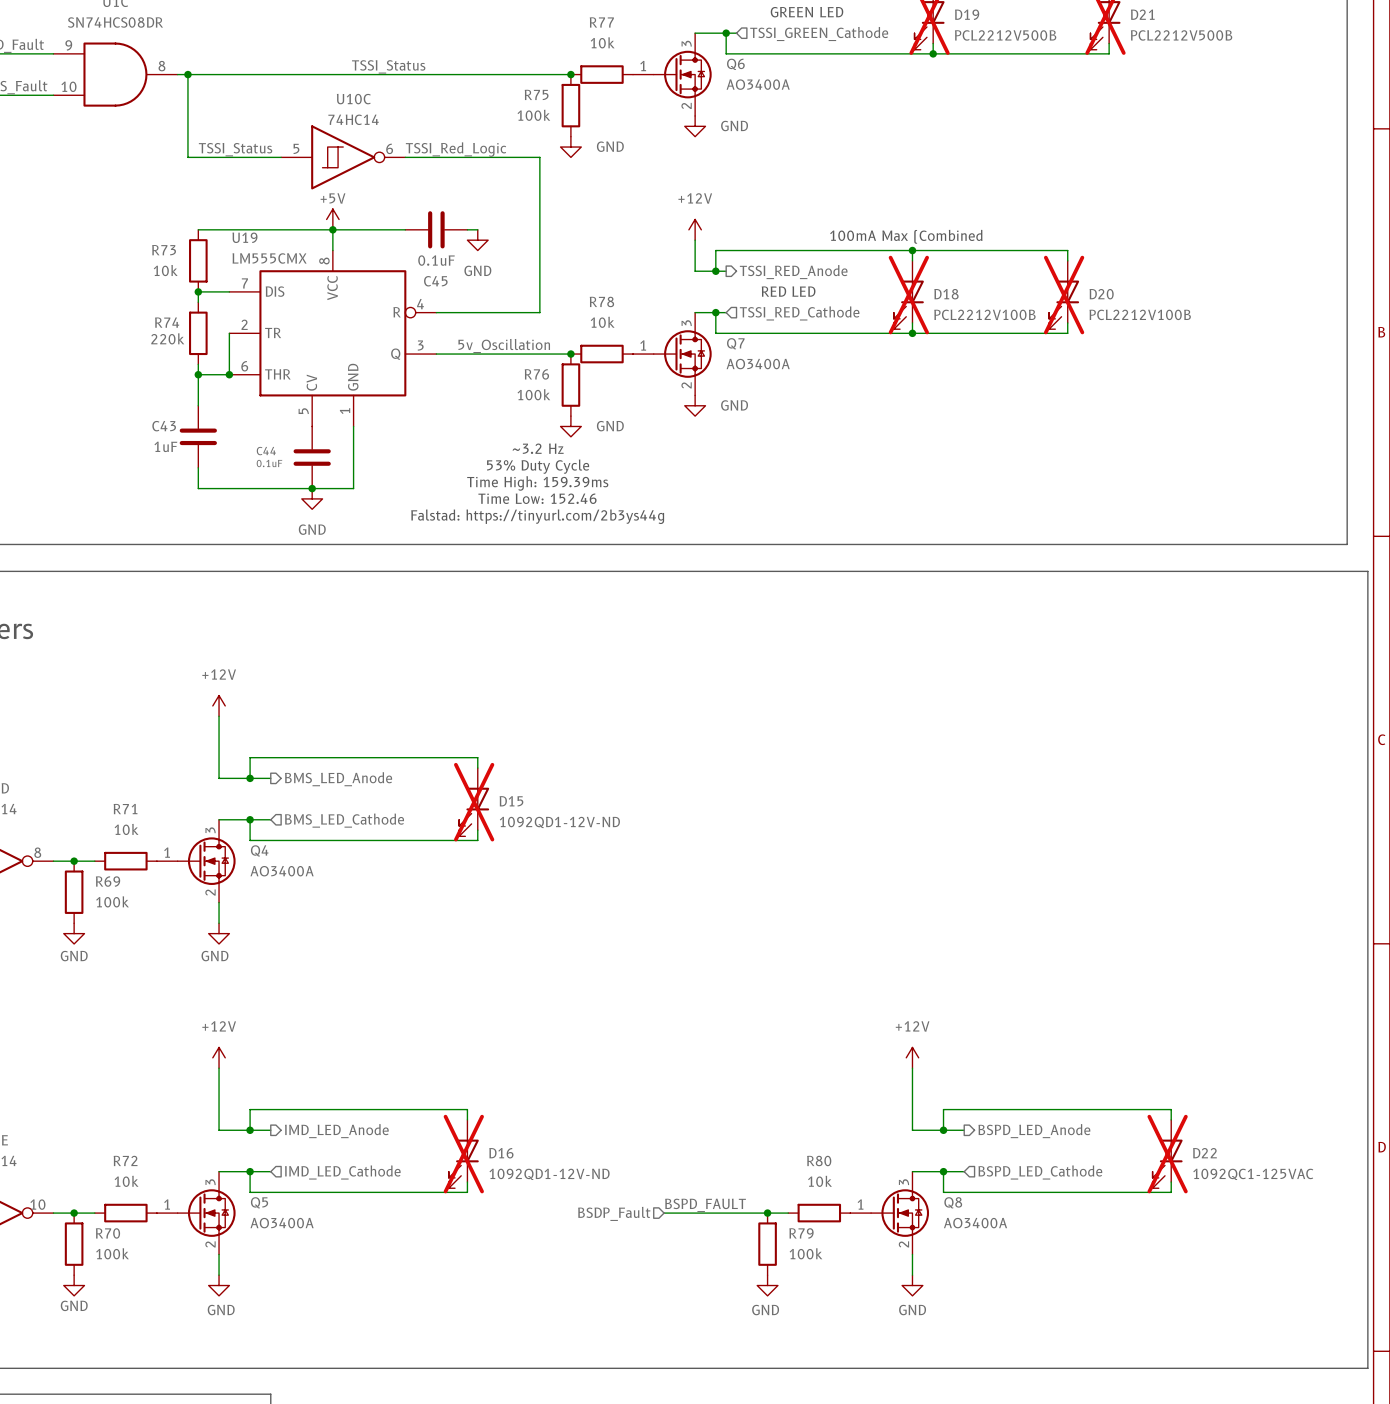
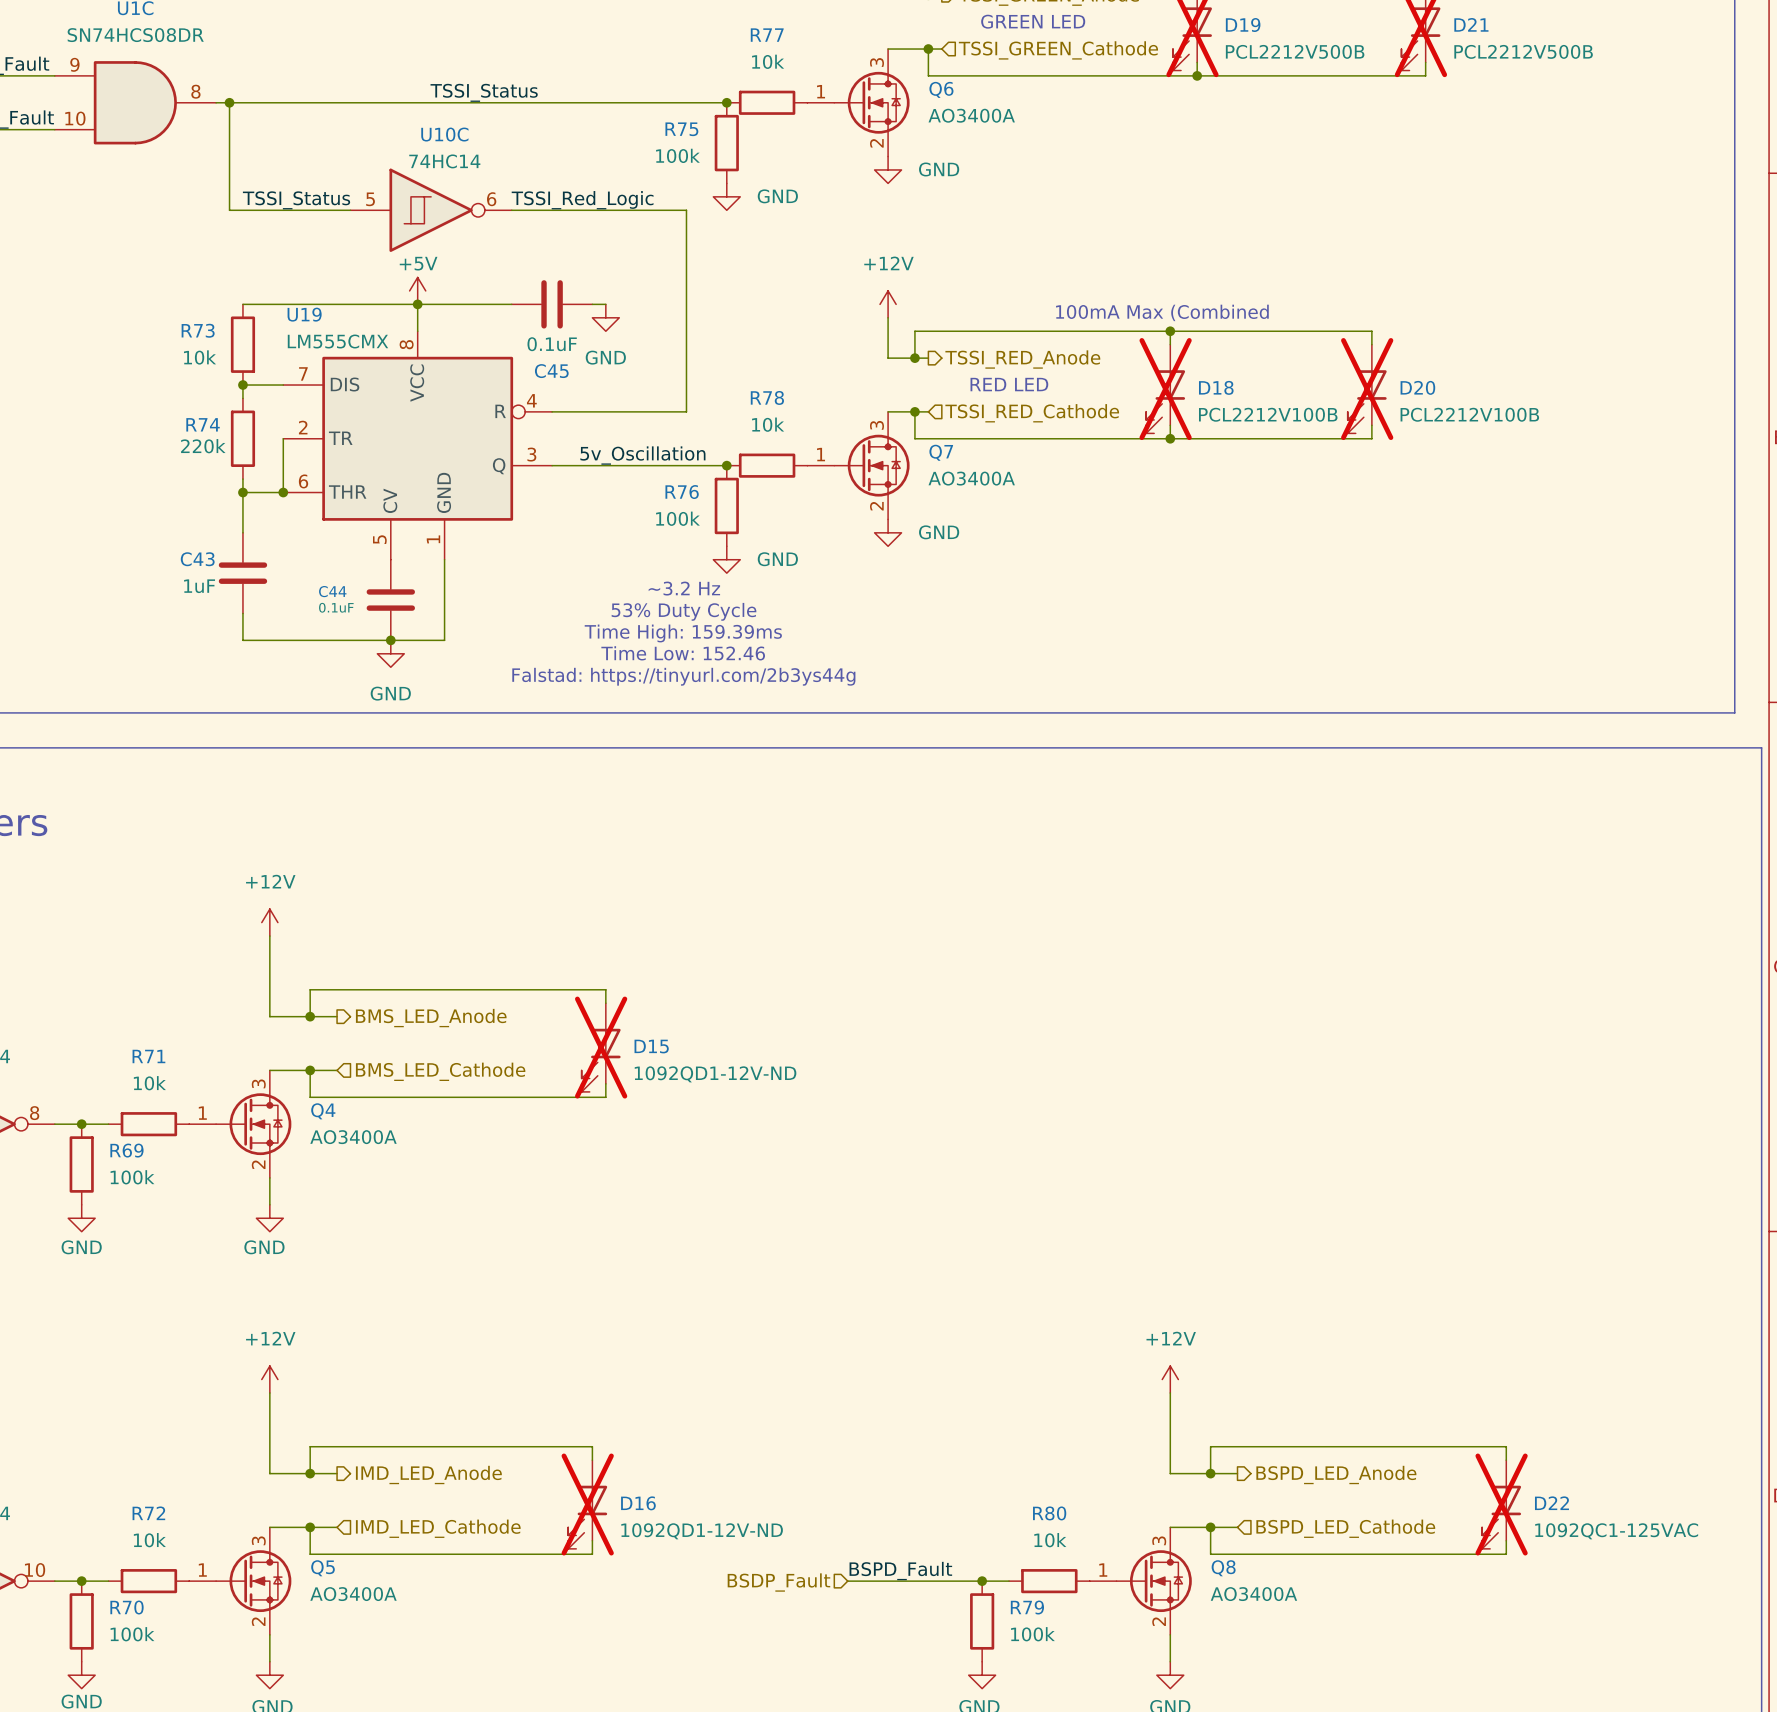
label: BSPD_FAULT (705, 1205) -> BSPD_Fault (900, 1571)

